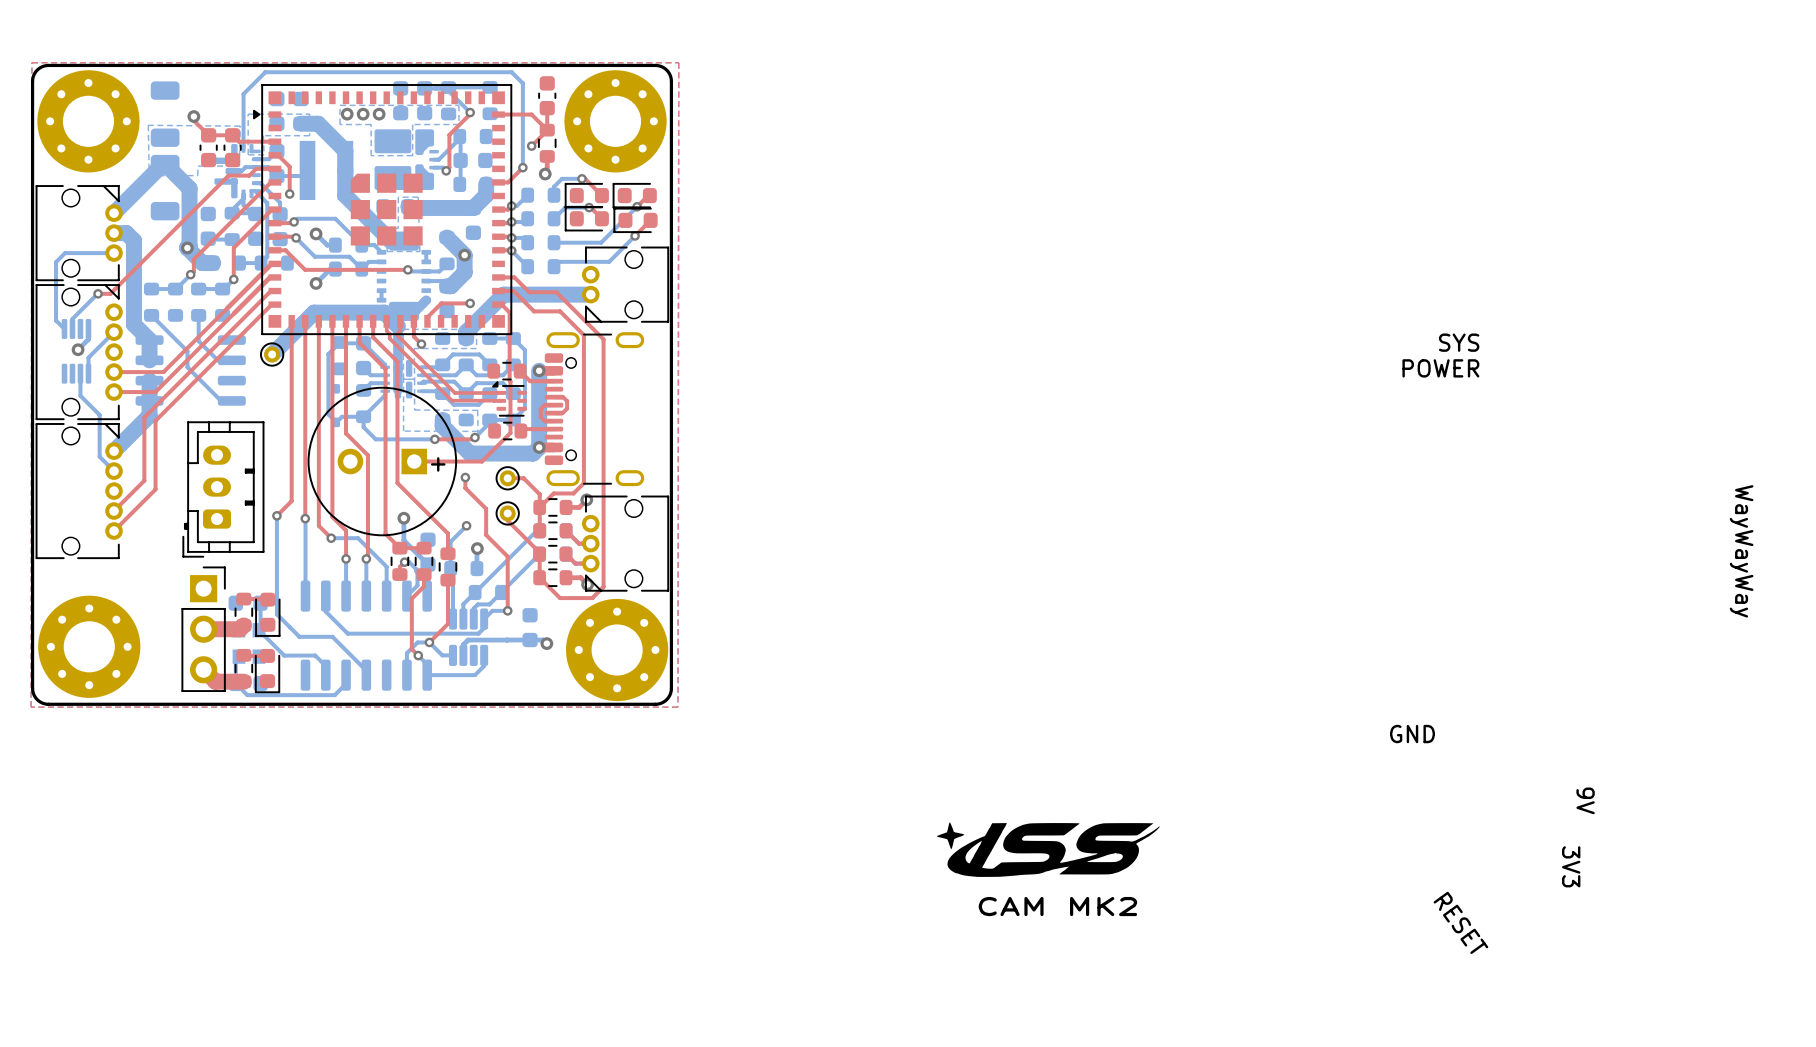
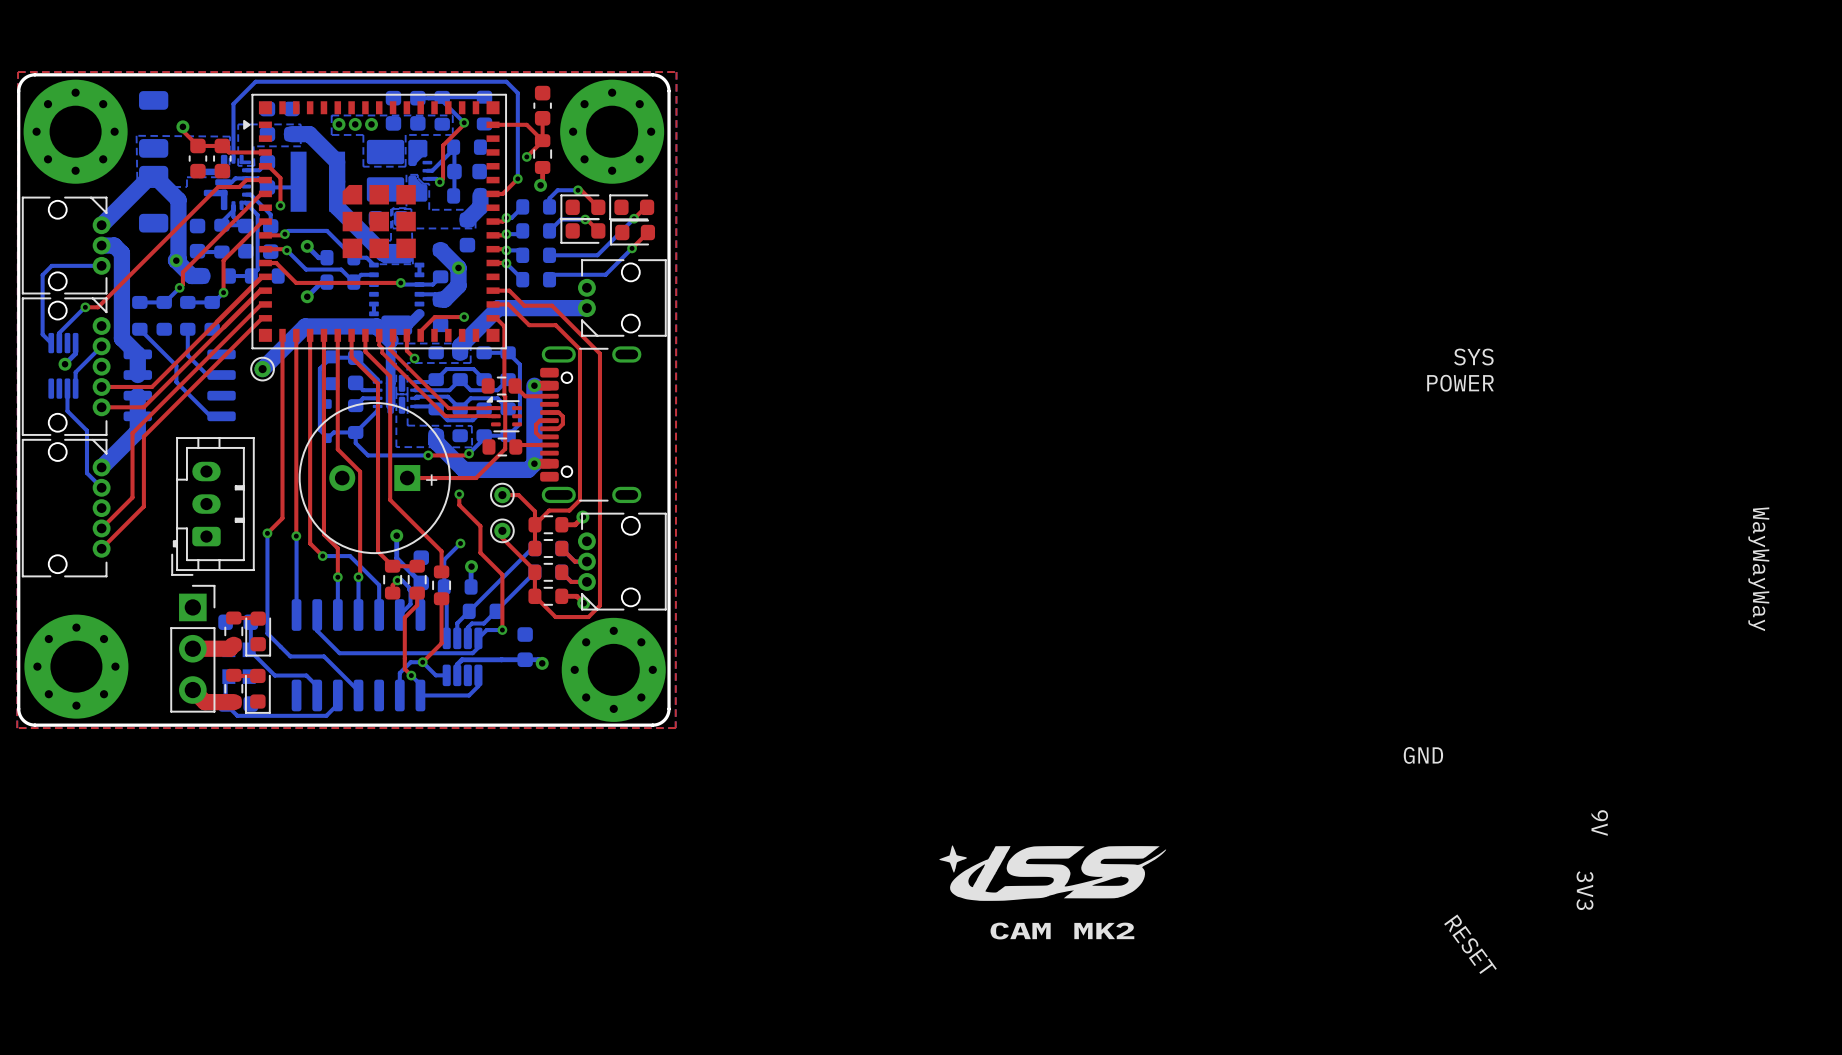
bottom zone outline: none -> (406, 174) (406, 208) (392, 208) (392, 228) (475, 228) (475, 209) (429, 209) (429, 183) (423, 183) (417, 178) (417, 174) (406, 174)
bottom track: (408, 206) (473, 207) -> none

